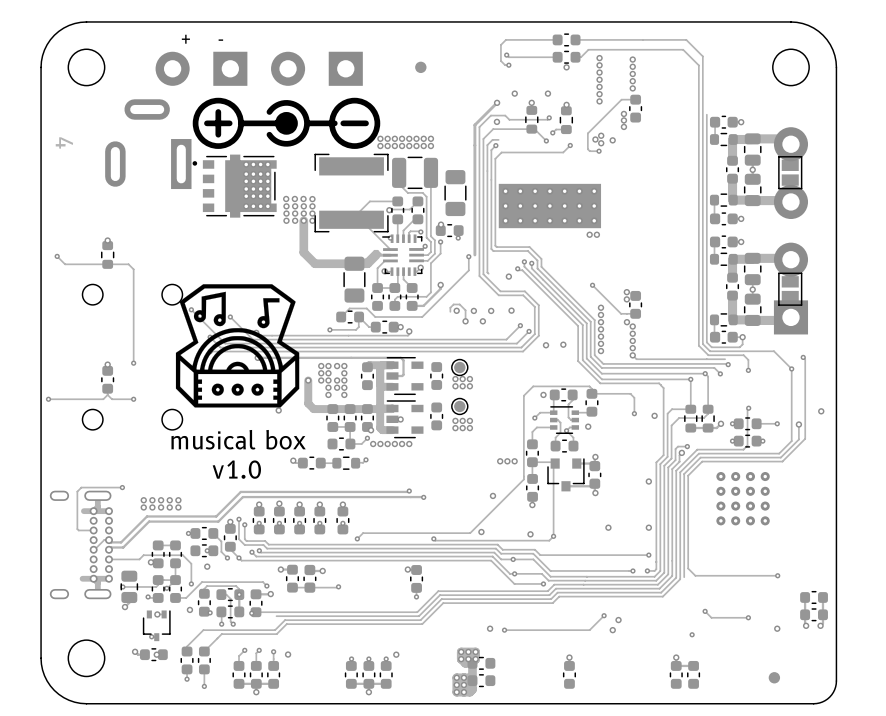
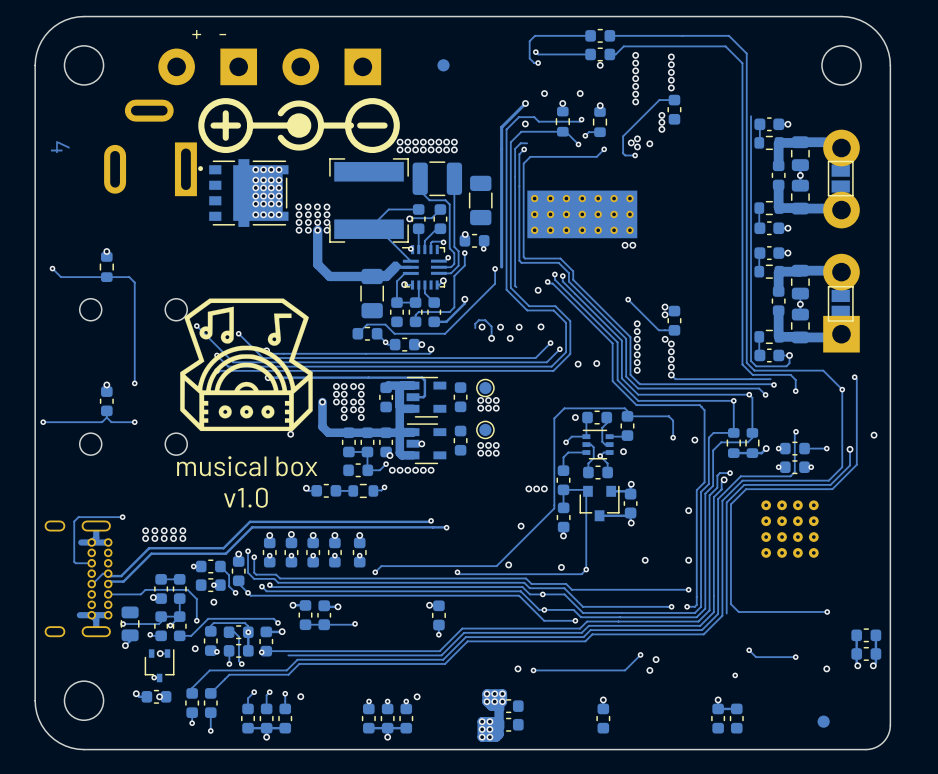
track: (358, 317) (358, 327) (355, 329) (329, 329) -> none
via position: (329, 329) -> (385, 342)

